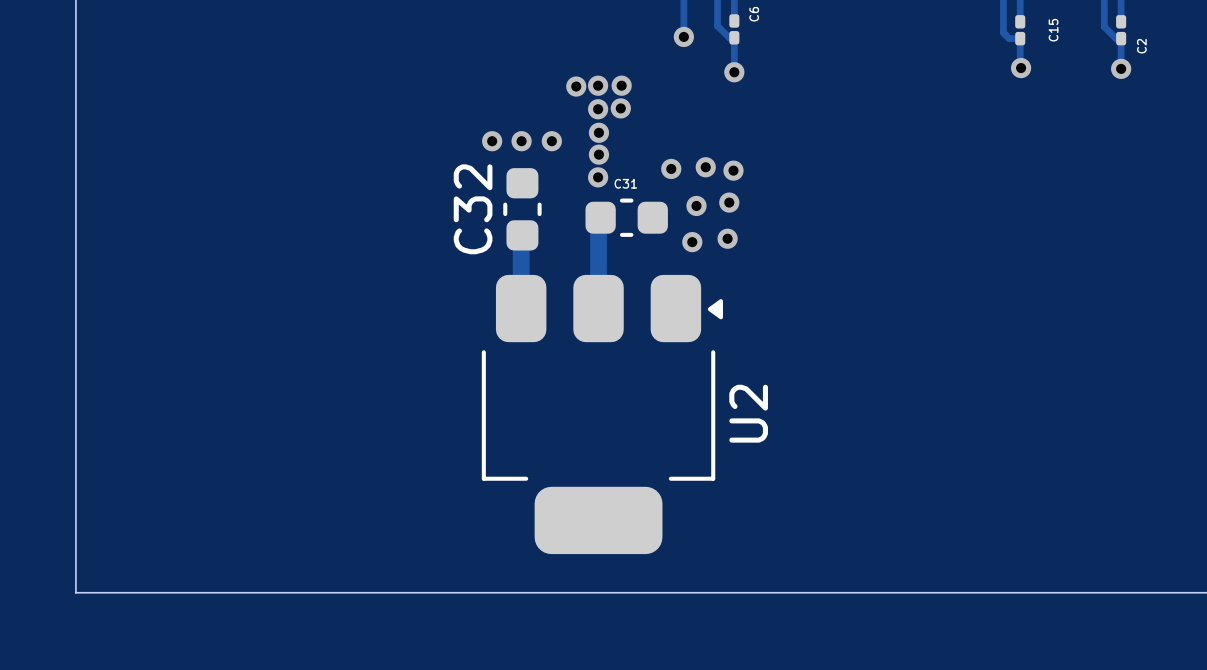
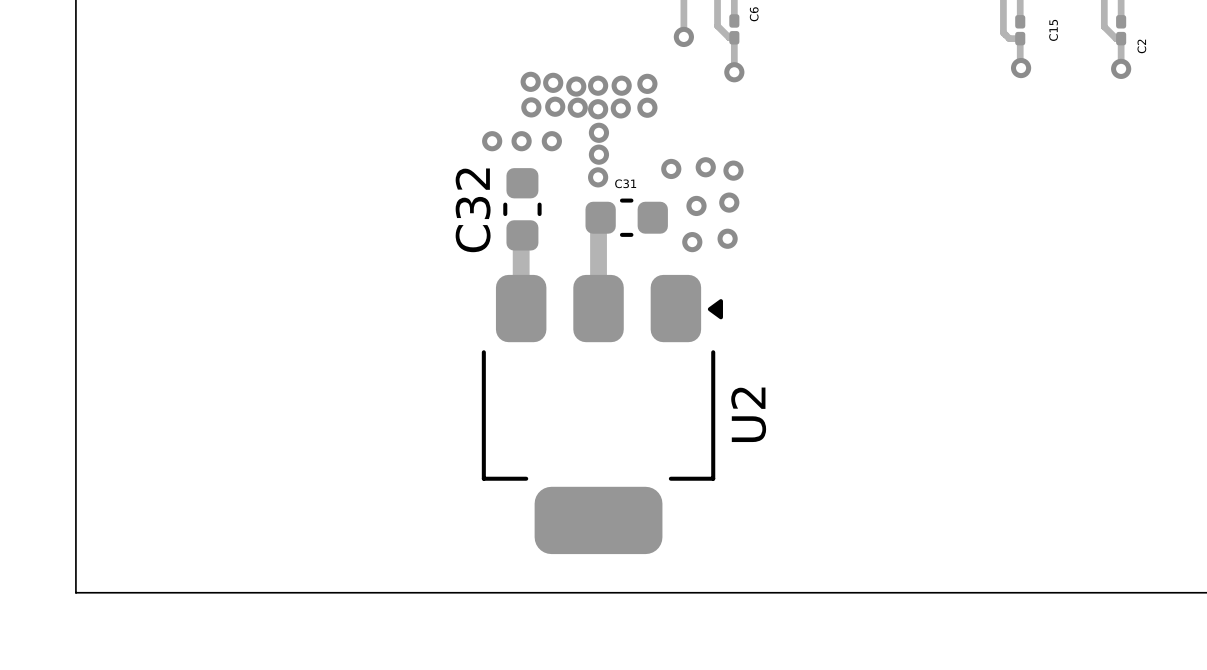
via: none -> (530, 81)
via: none -> (553, 82)
via: none -> (647, 83)
via: none -> (555, 106)
via: none -> (531, 107)
via: none -> (577, 107)
via: none -> (647, 107)

